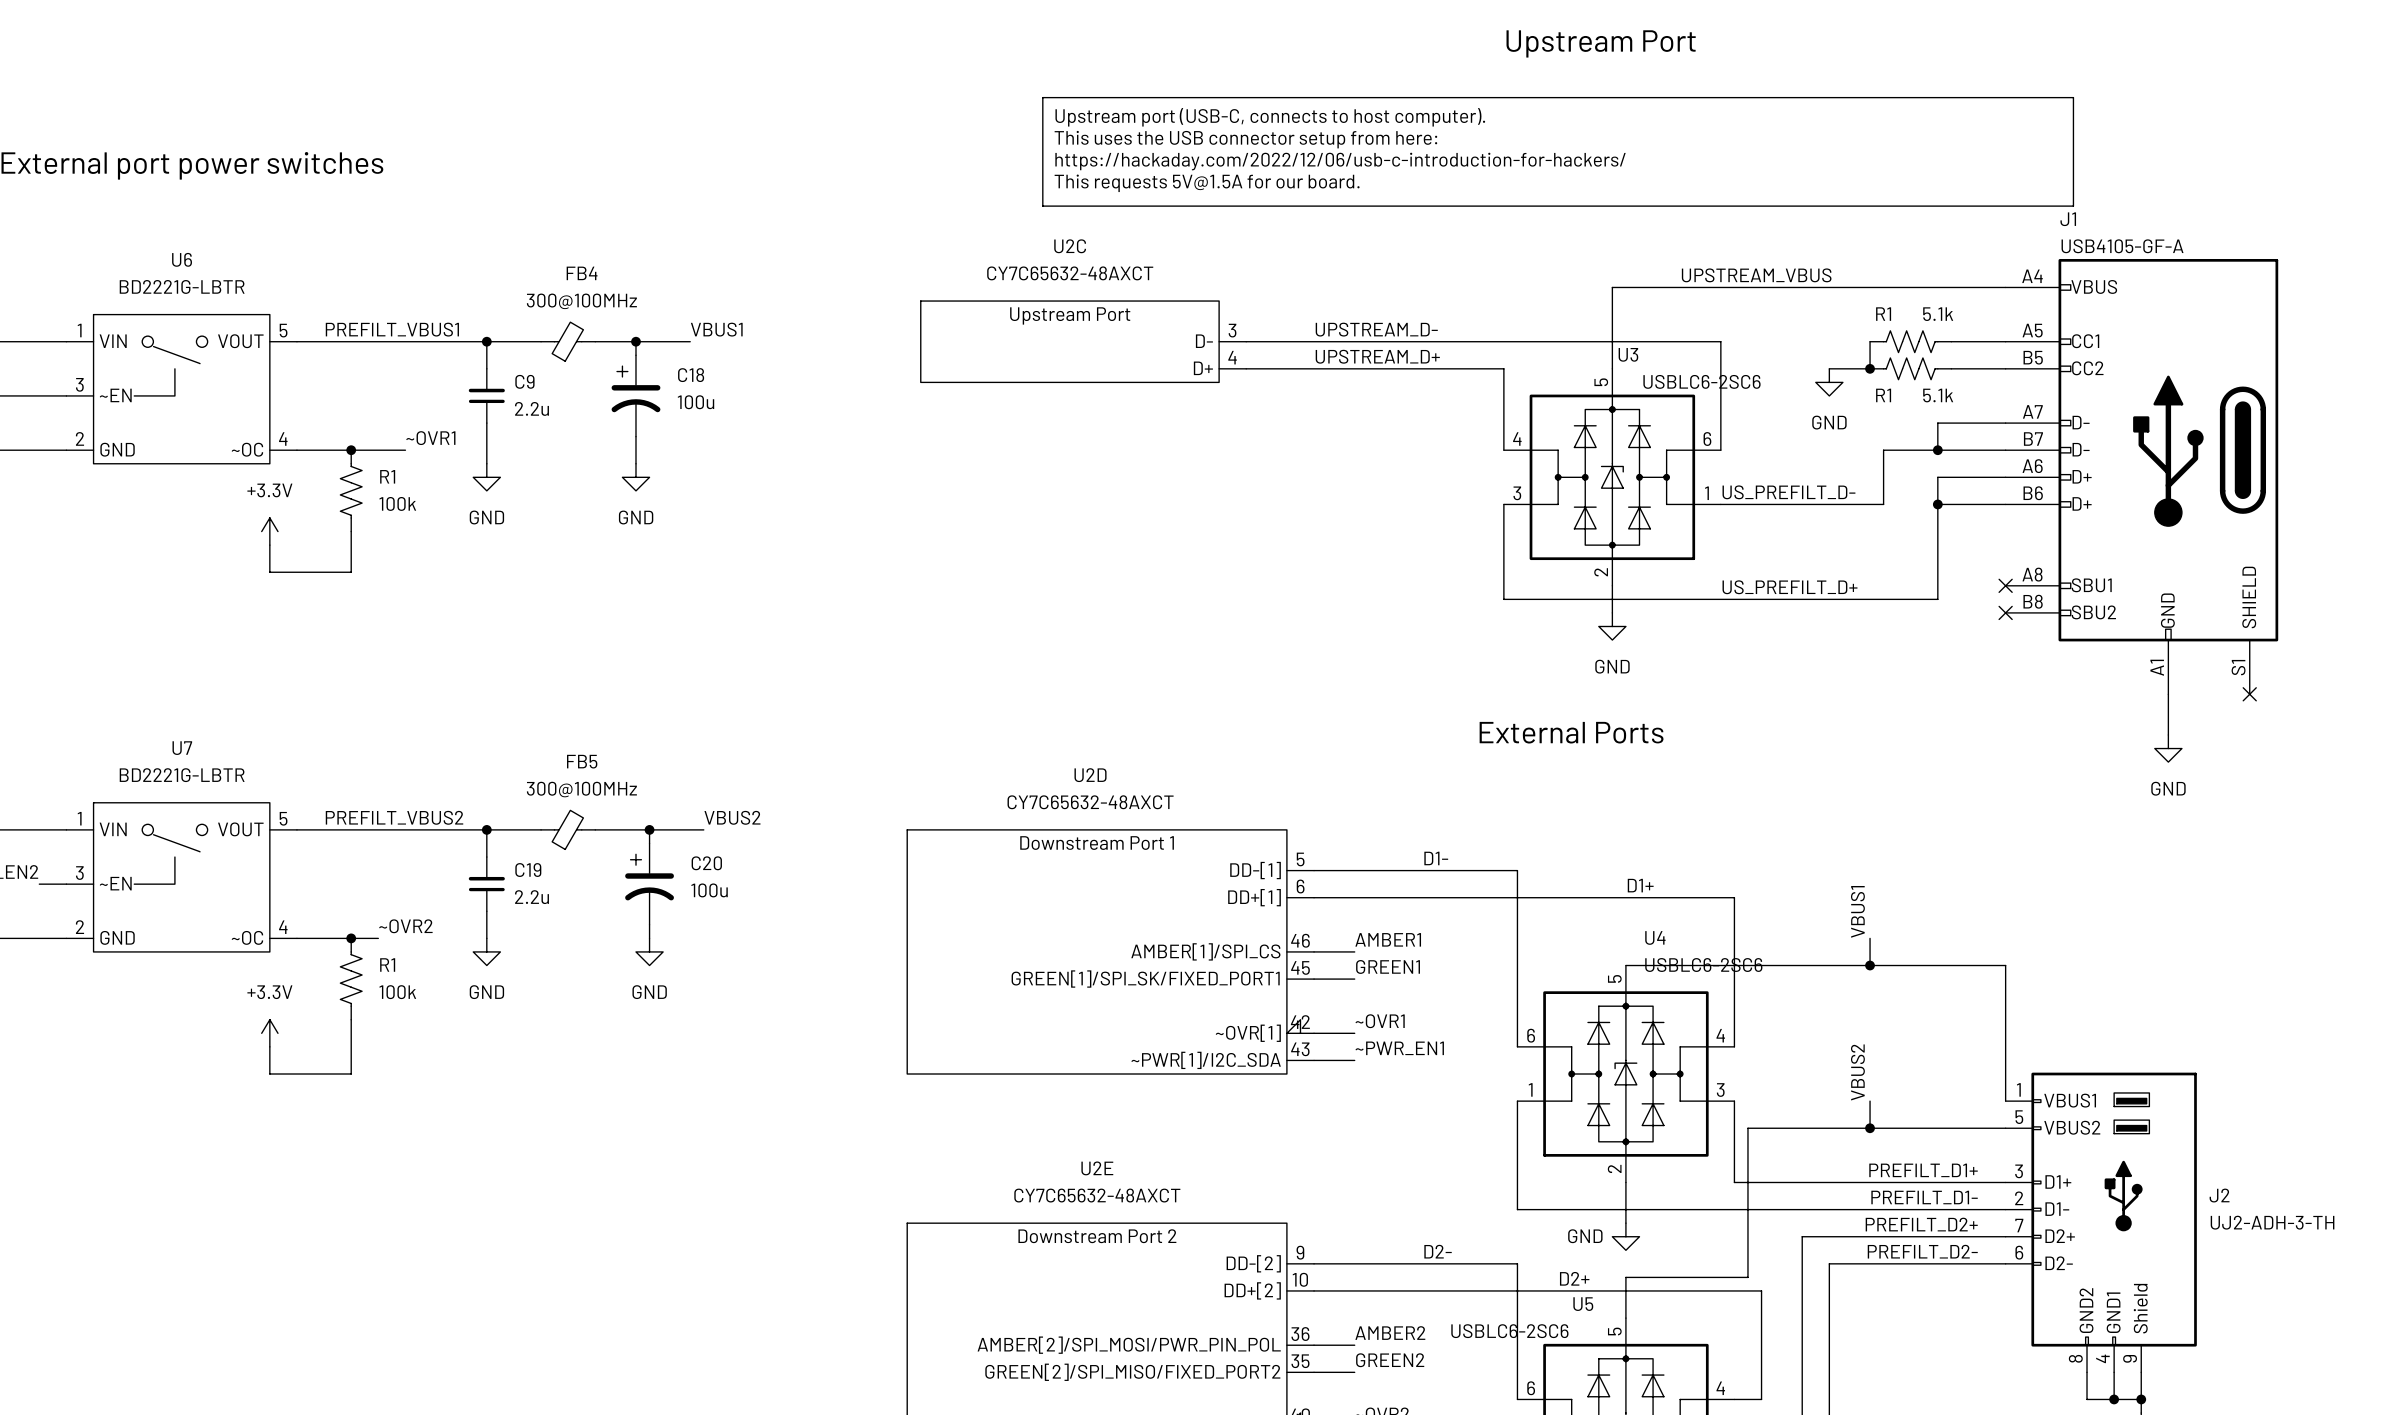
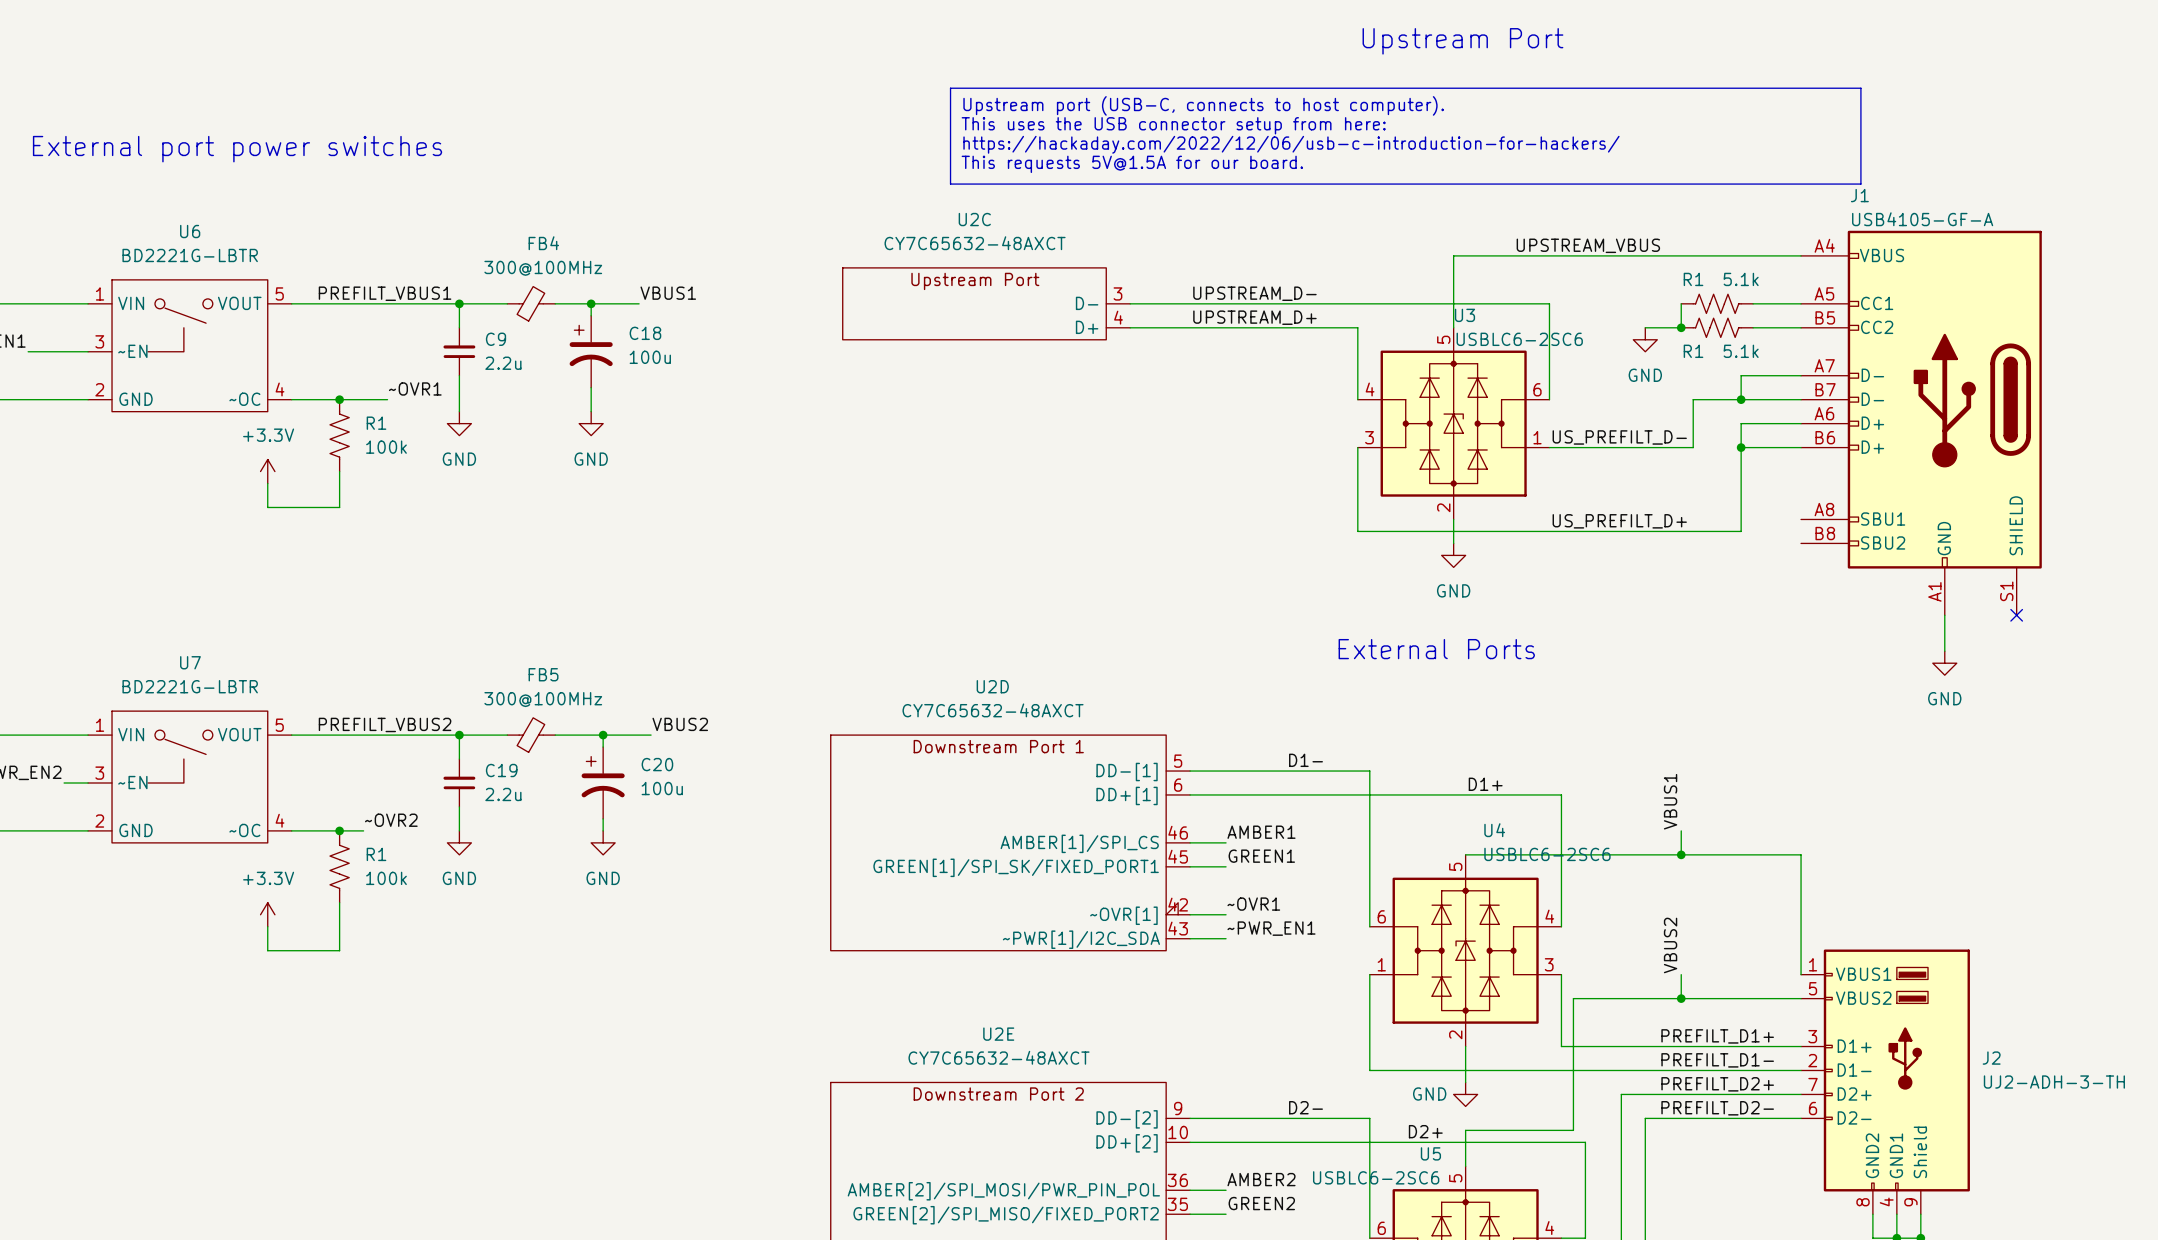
no-connect mark: (2005, 585) -> none
no-connect mark: (2005, 612) -> none

